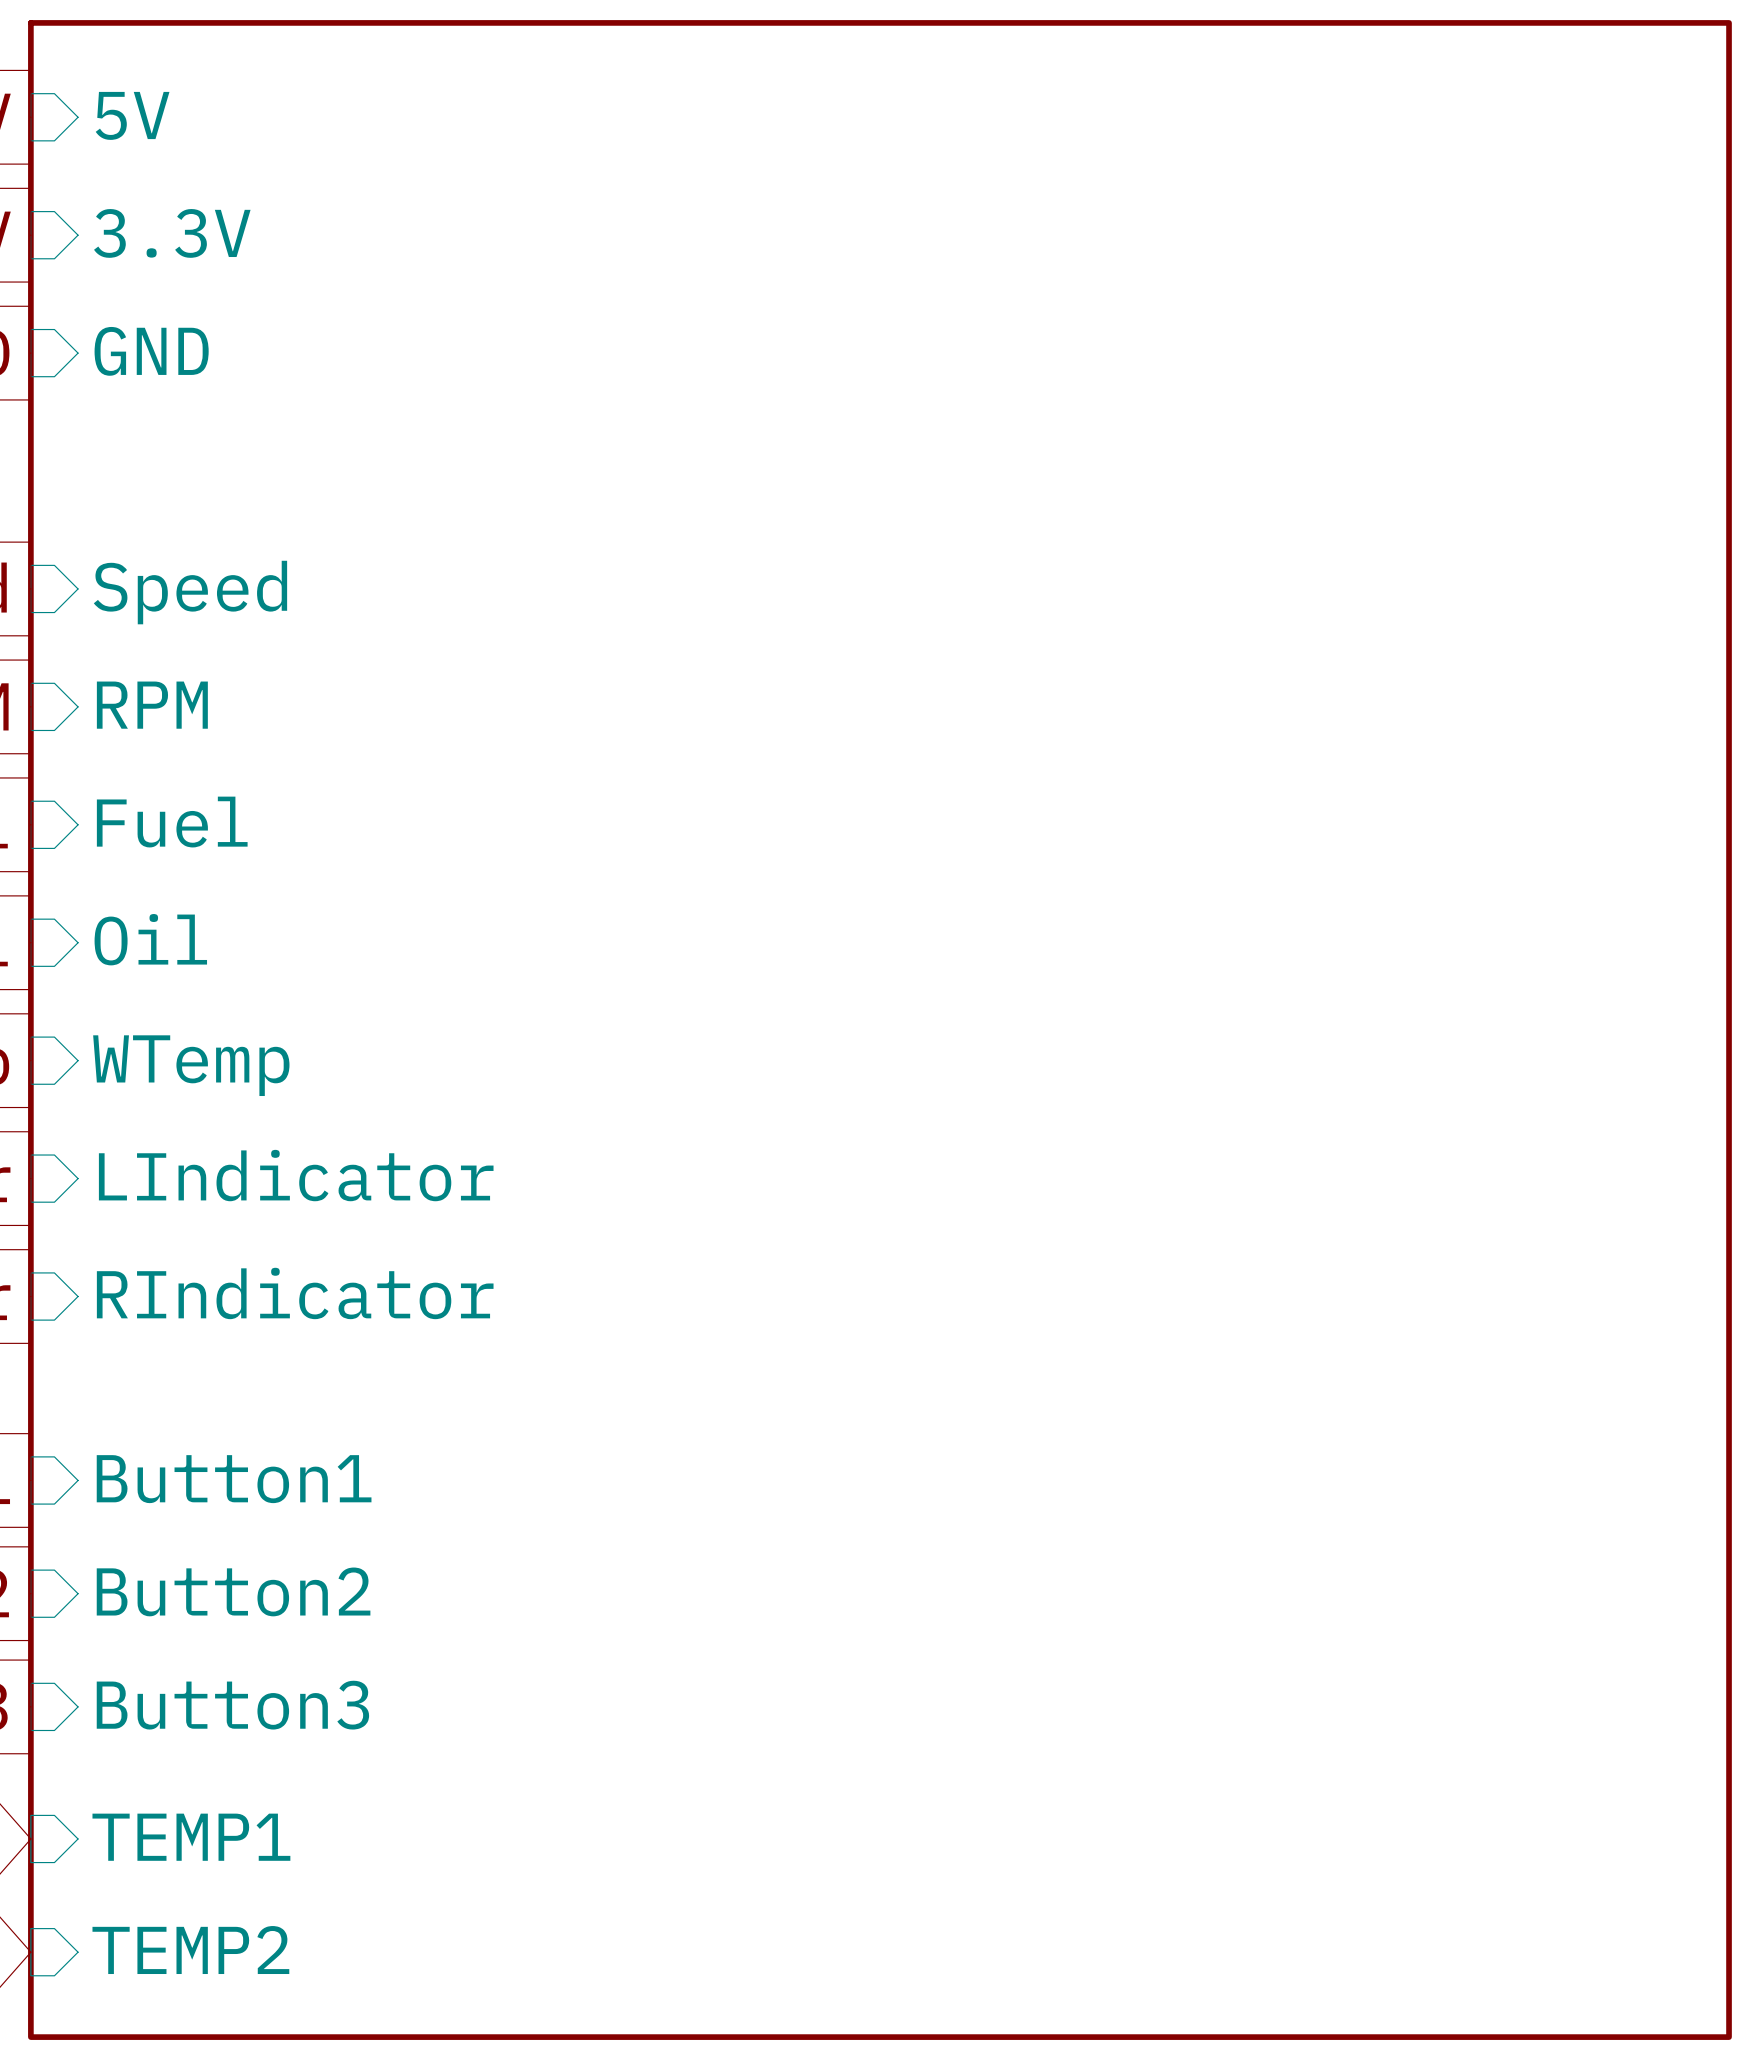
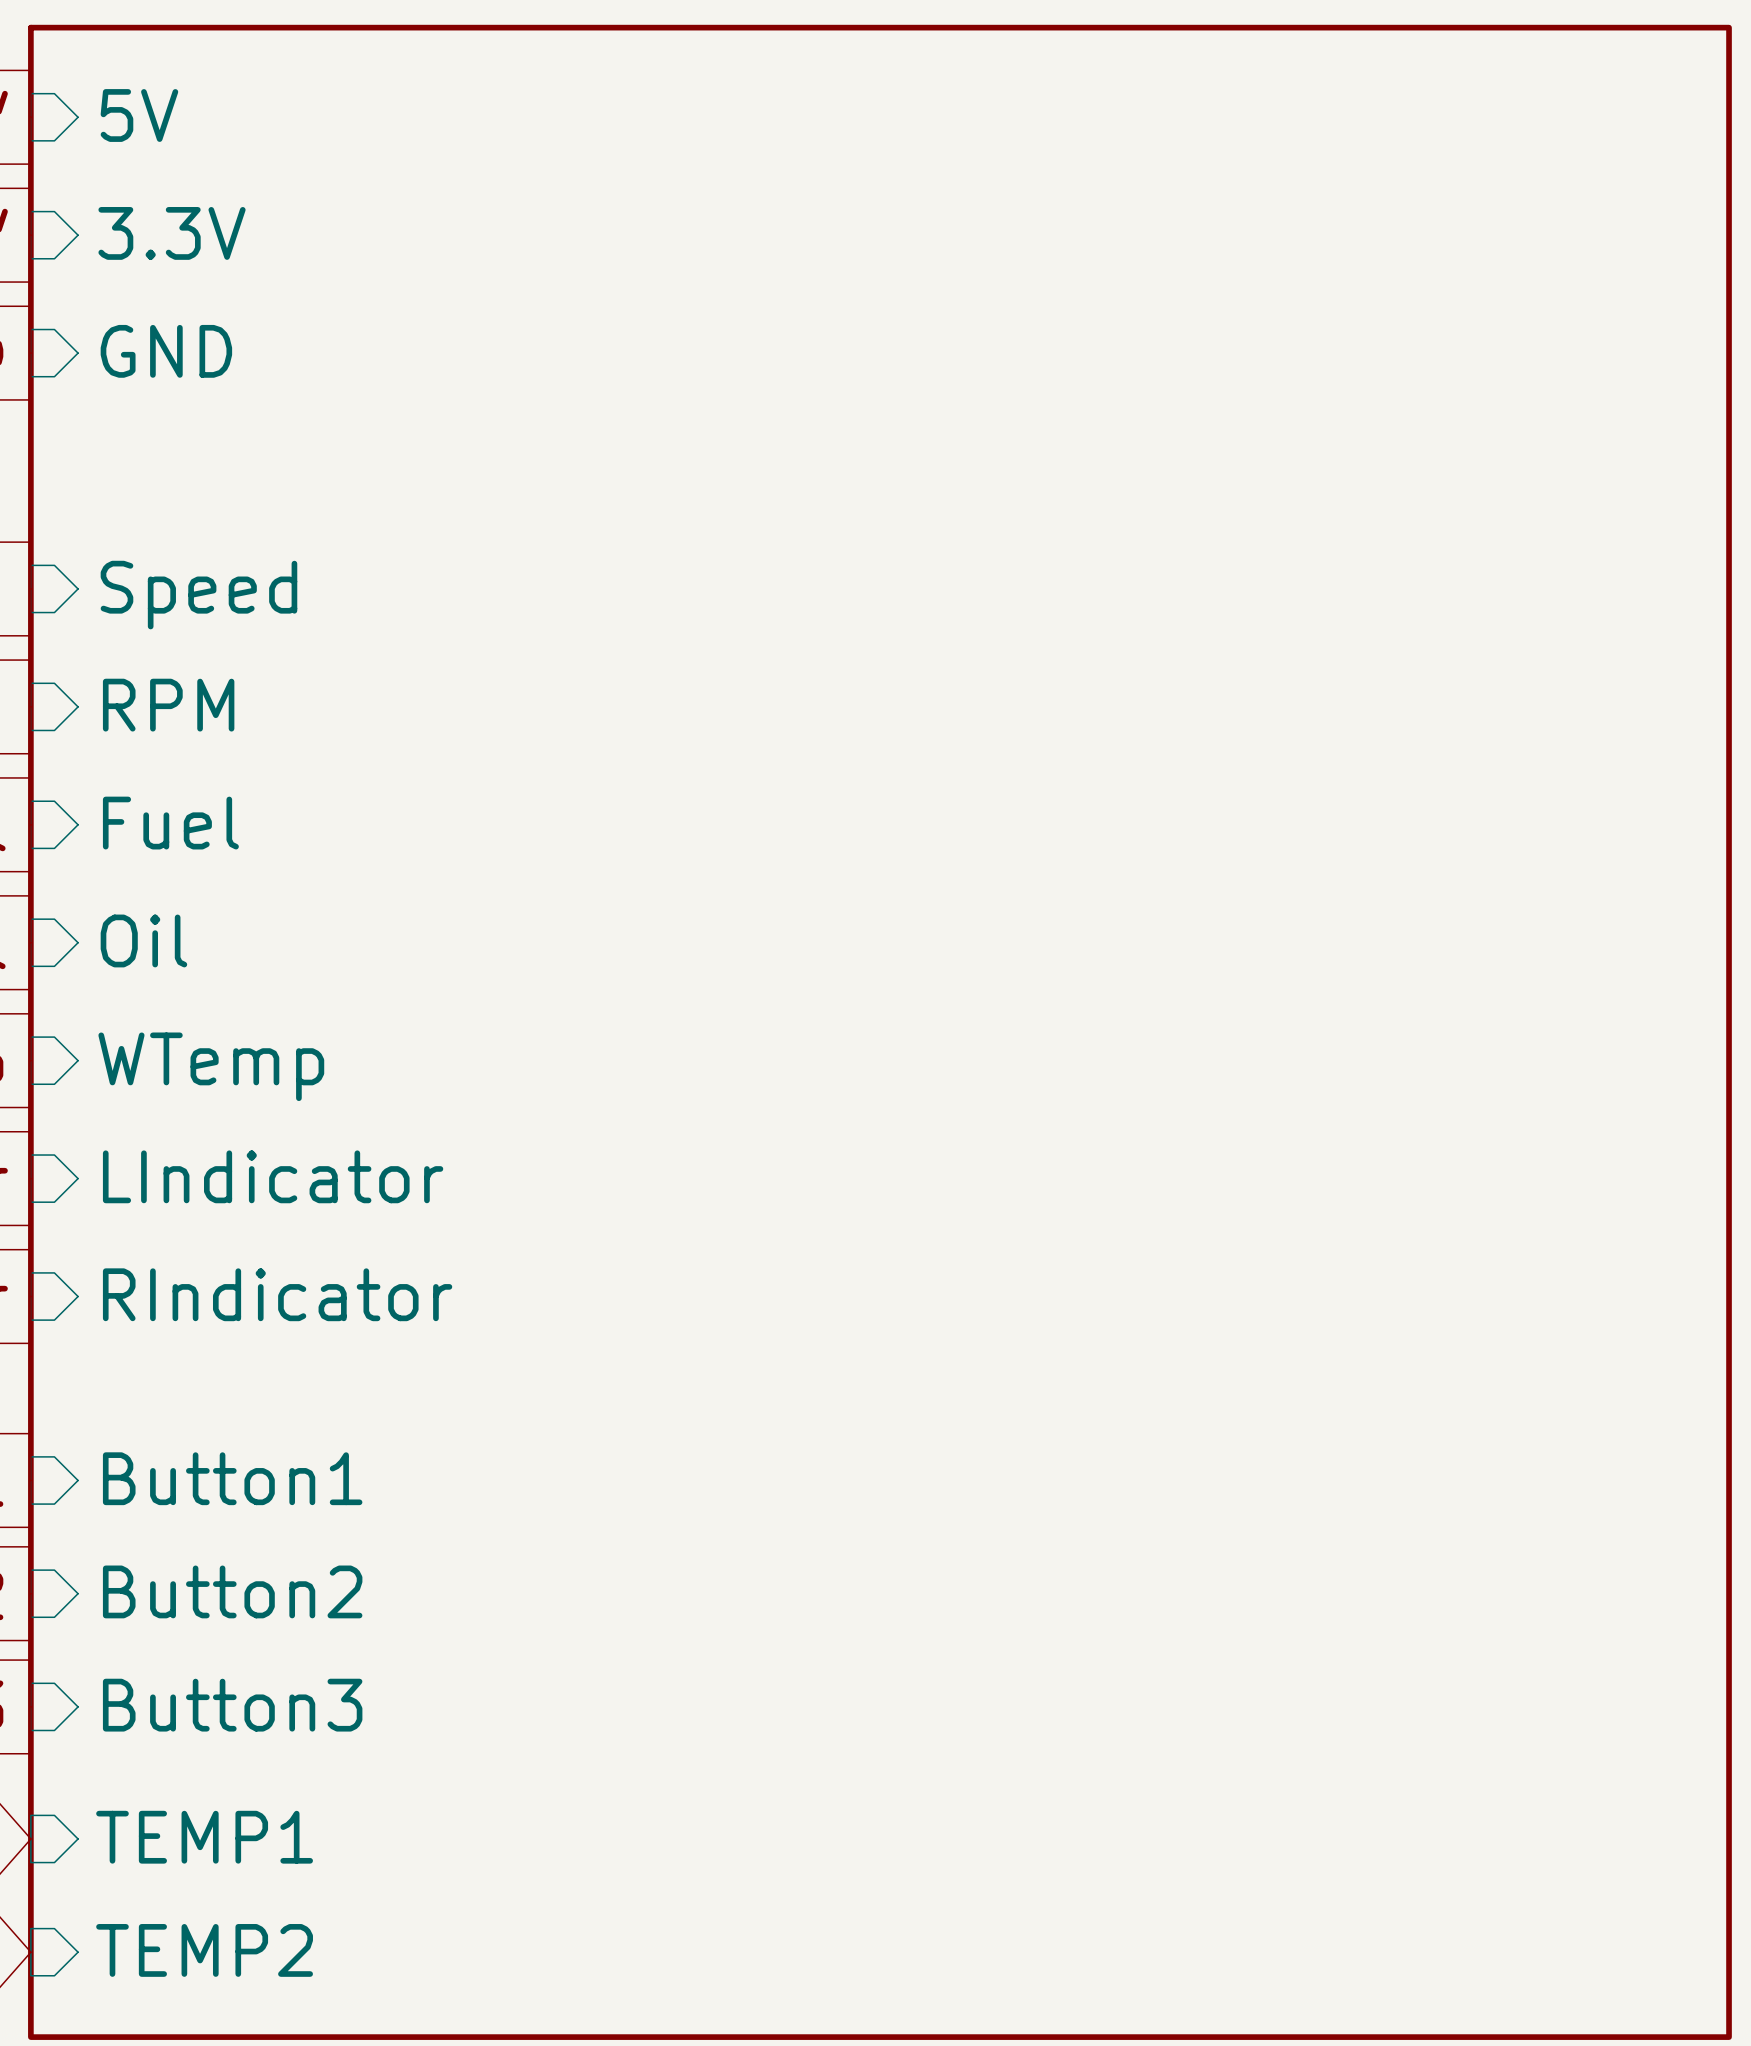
sheet shape: [28, 20, 1732, 2040] -> [28, 24, 1732, 2040]

